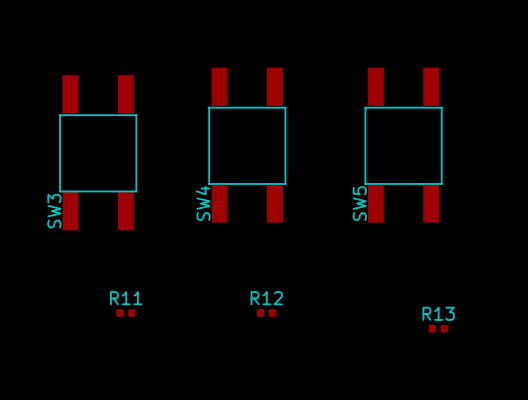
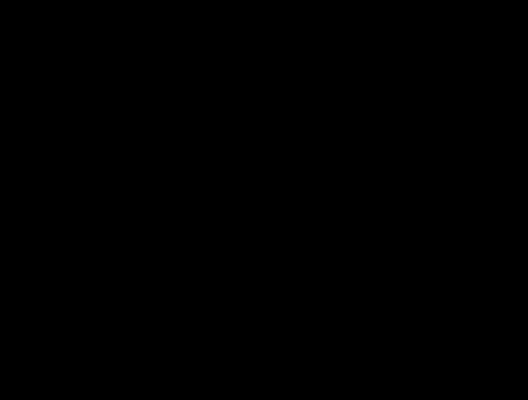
SW4: (247, 145) -> none
SW5: (403, 145) -> none
SW3: (98, 152) -> none
R11: (125, 313) -> none
R12: (266, 313) -> none
R13: (438, 328) -> none

